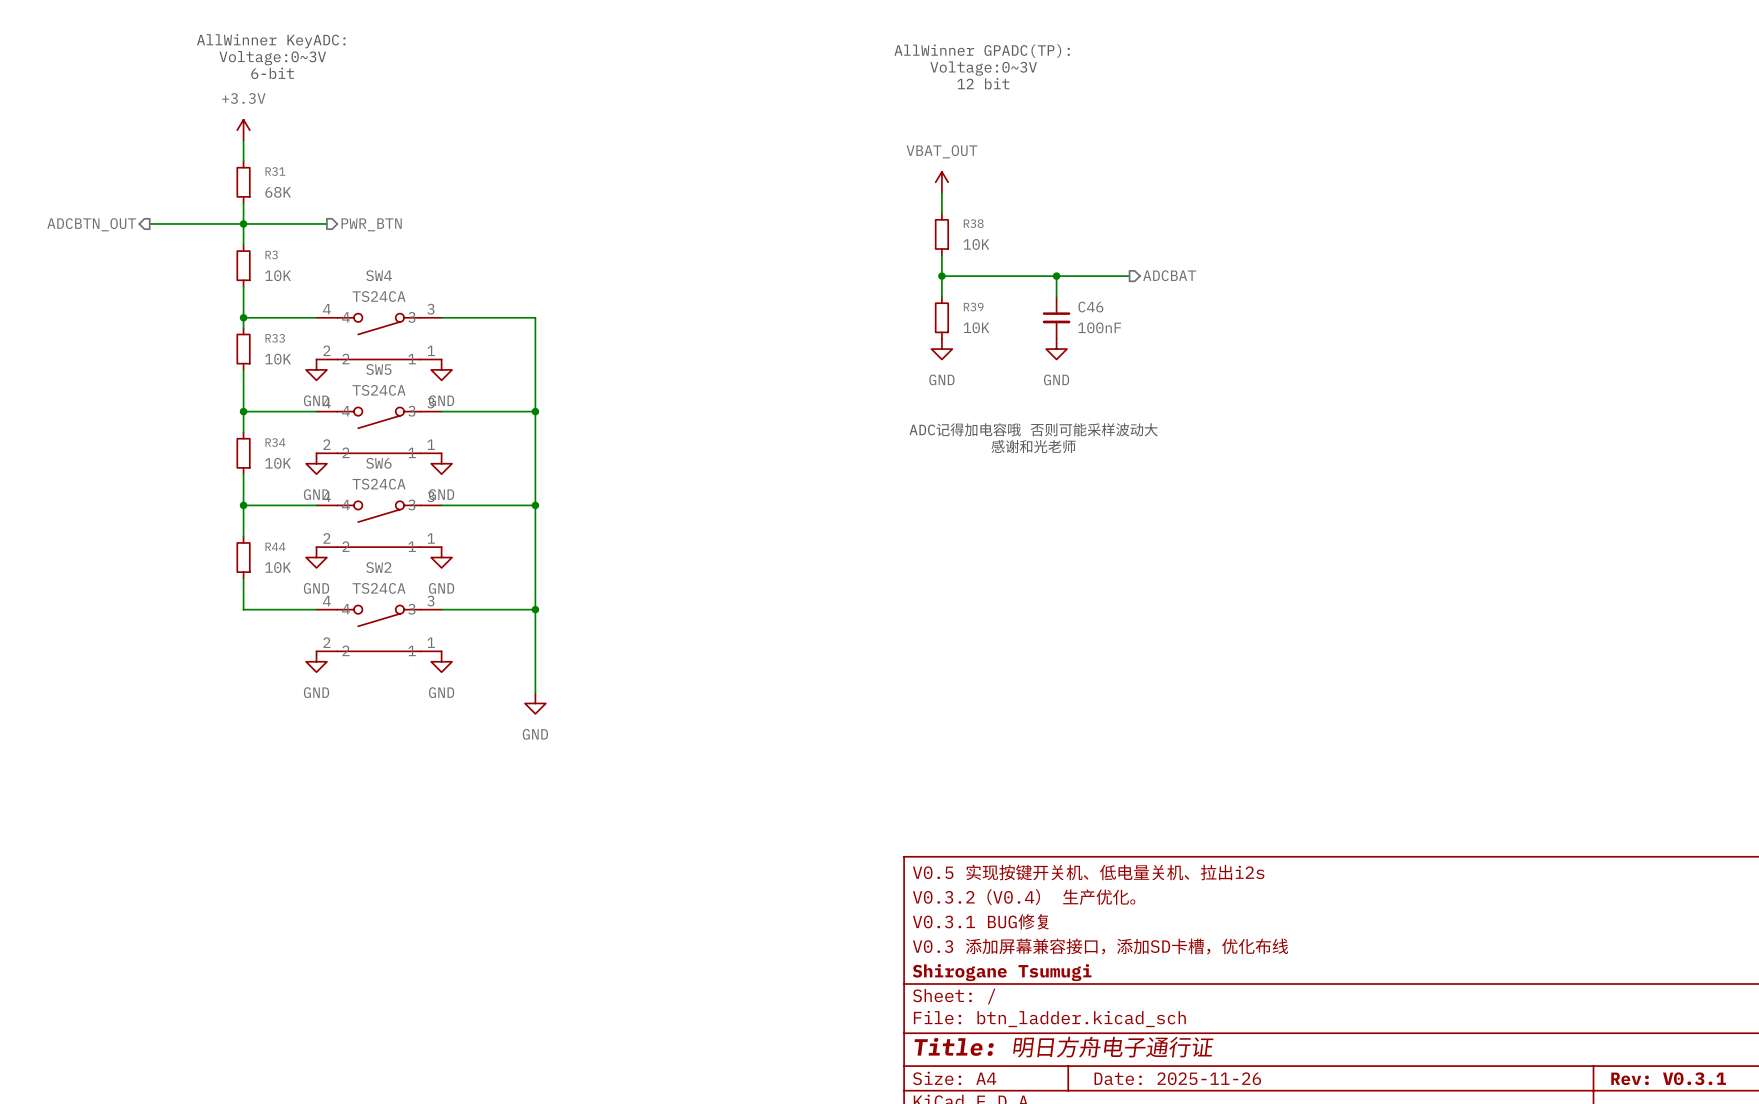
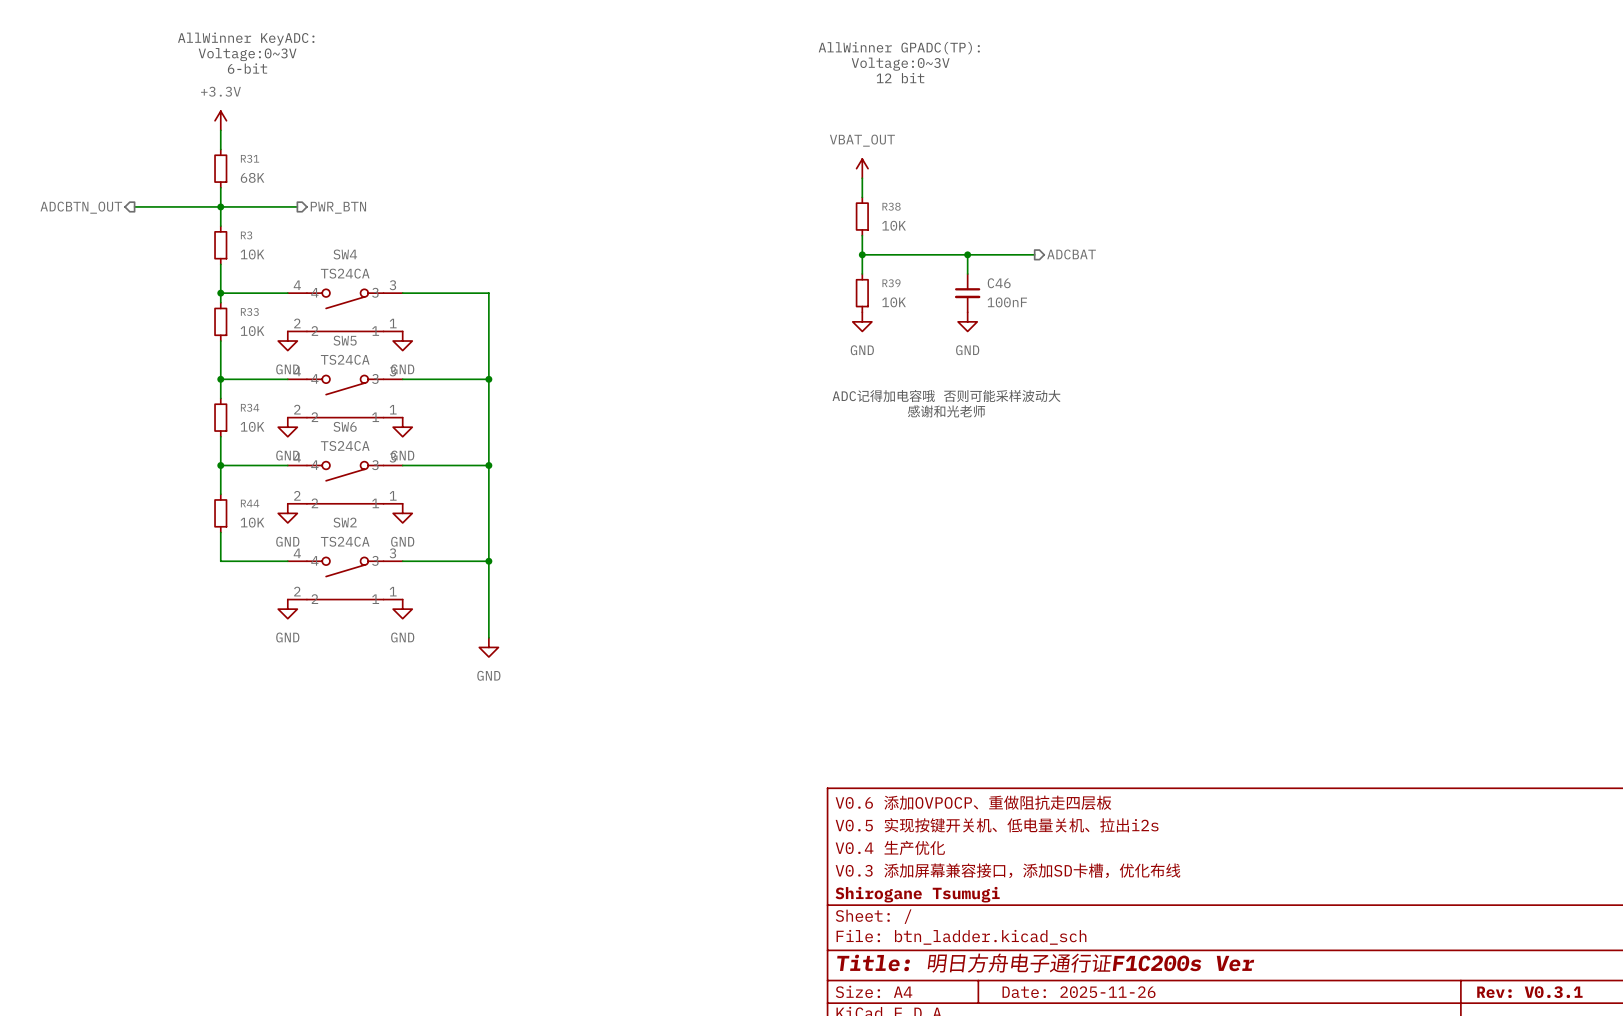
title block: V0.5 实现按键开关机、低电量关机、拉出i2s (1088, 872) -> V0.6 添加OVPOCP、重做阻抗走四层板 (973, 802)
title block: V0.3.2（V0.4） 生产优化。 (1024, 897) -> V0.5 实现按键开关机、低电量关机、拉出i2s (997, 825)
title block: V0.3.1 BUG修复 (980, 921) -> V0.4 生产优化 (890, 848)
title block: Title: 明日方舟电子通行证 (1063, 1047) -> Title: 明日方舟电子通行证F1C200s Ver (1045, 963)

